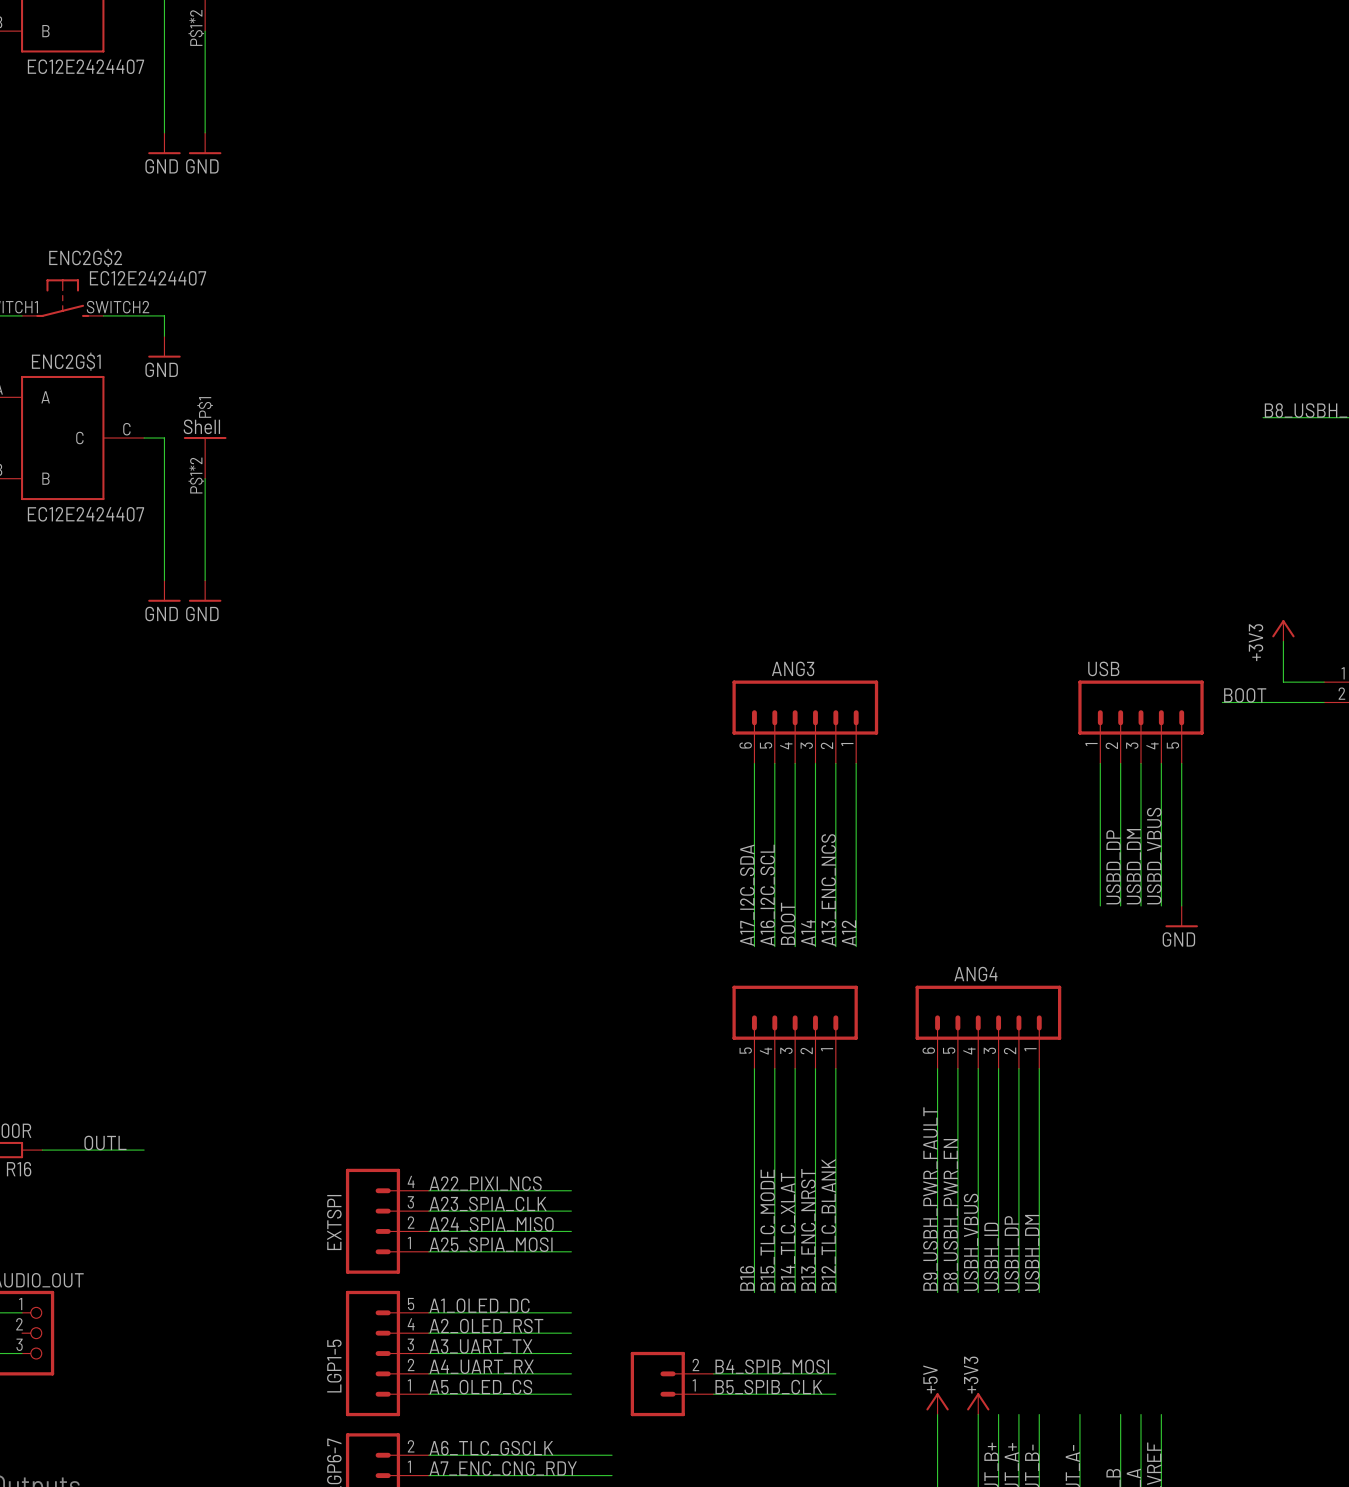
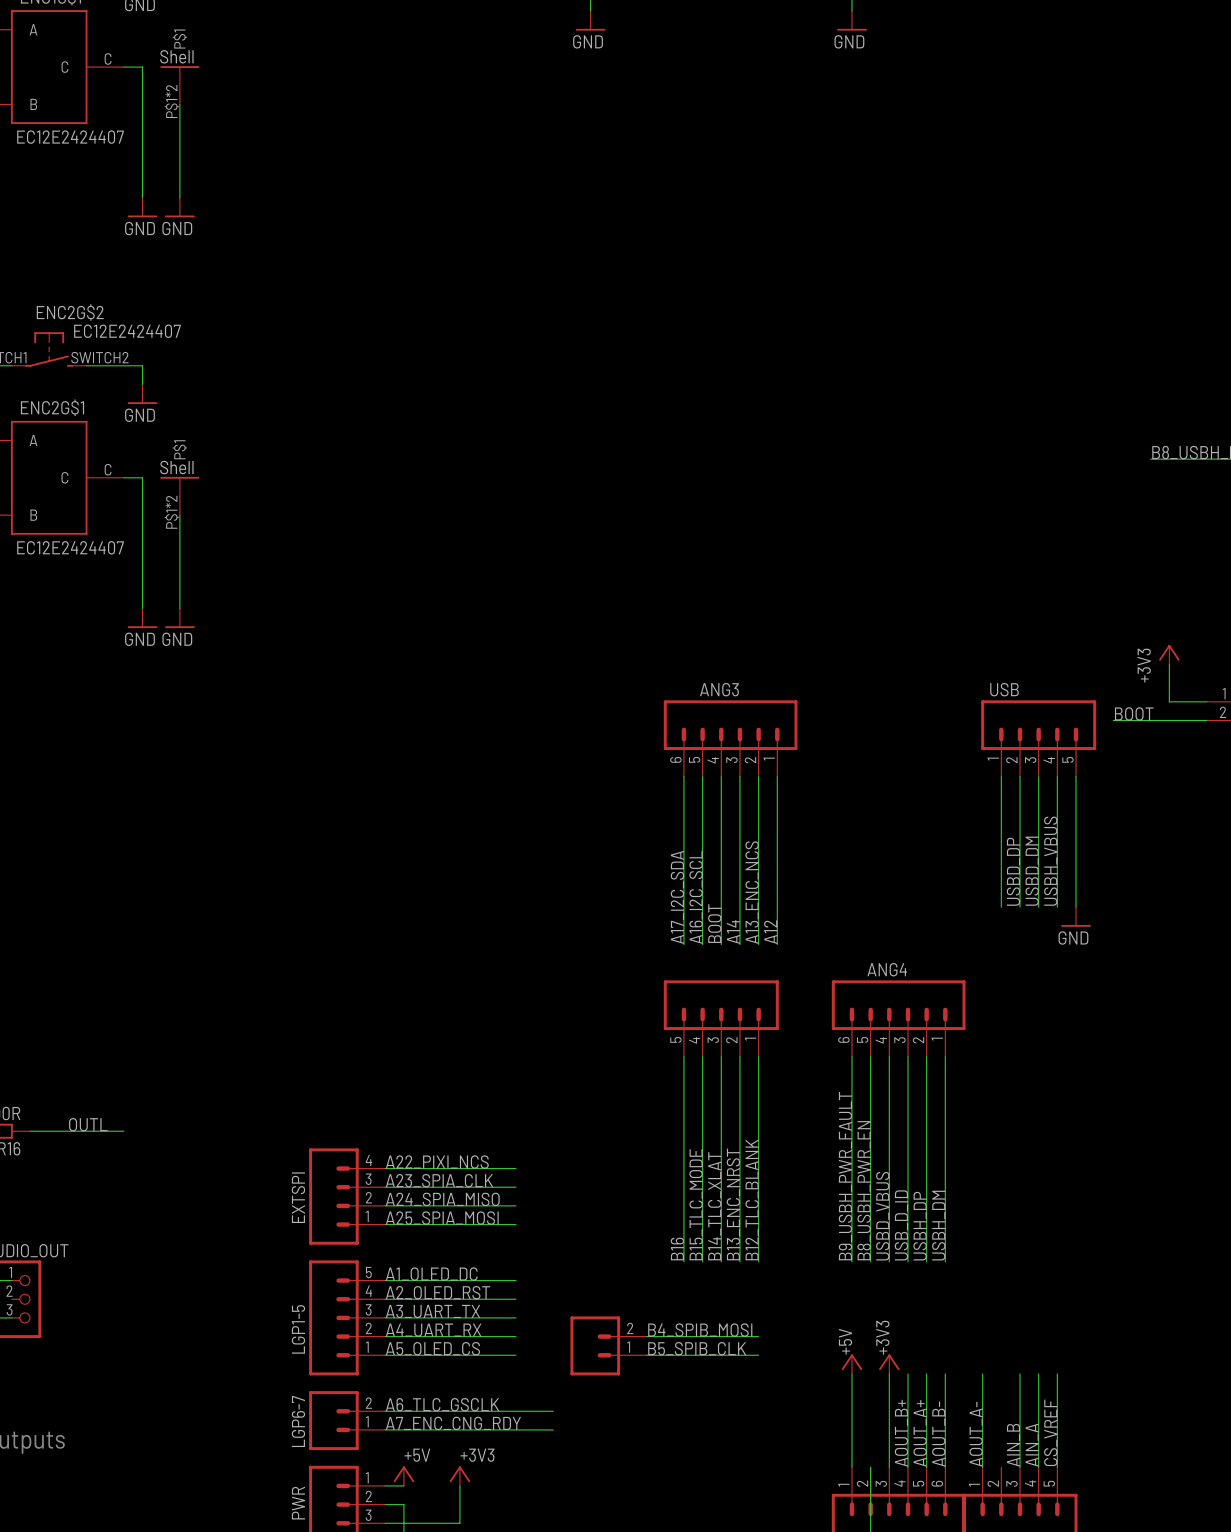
label: USBD_VBUS (1154, 856) -> USBH_VBUS (1050, 861)
label: USBH_VBUS (971, 1242) -> USBD_VBUS (882, 1216)
label: USBH_ID (991, 1256) -> USB_D_ID (901, 1225)

